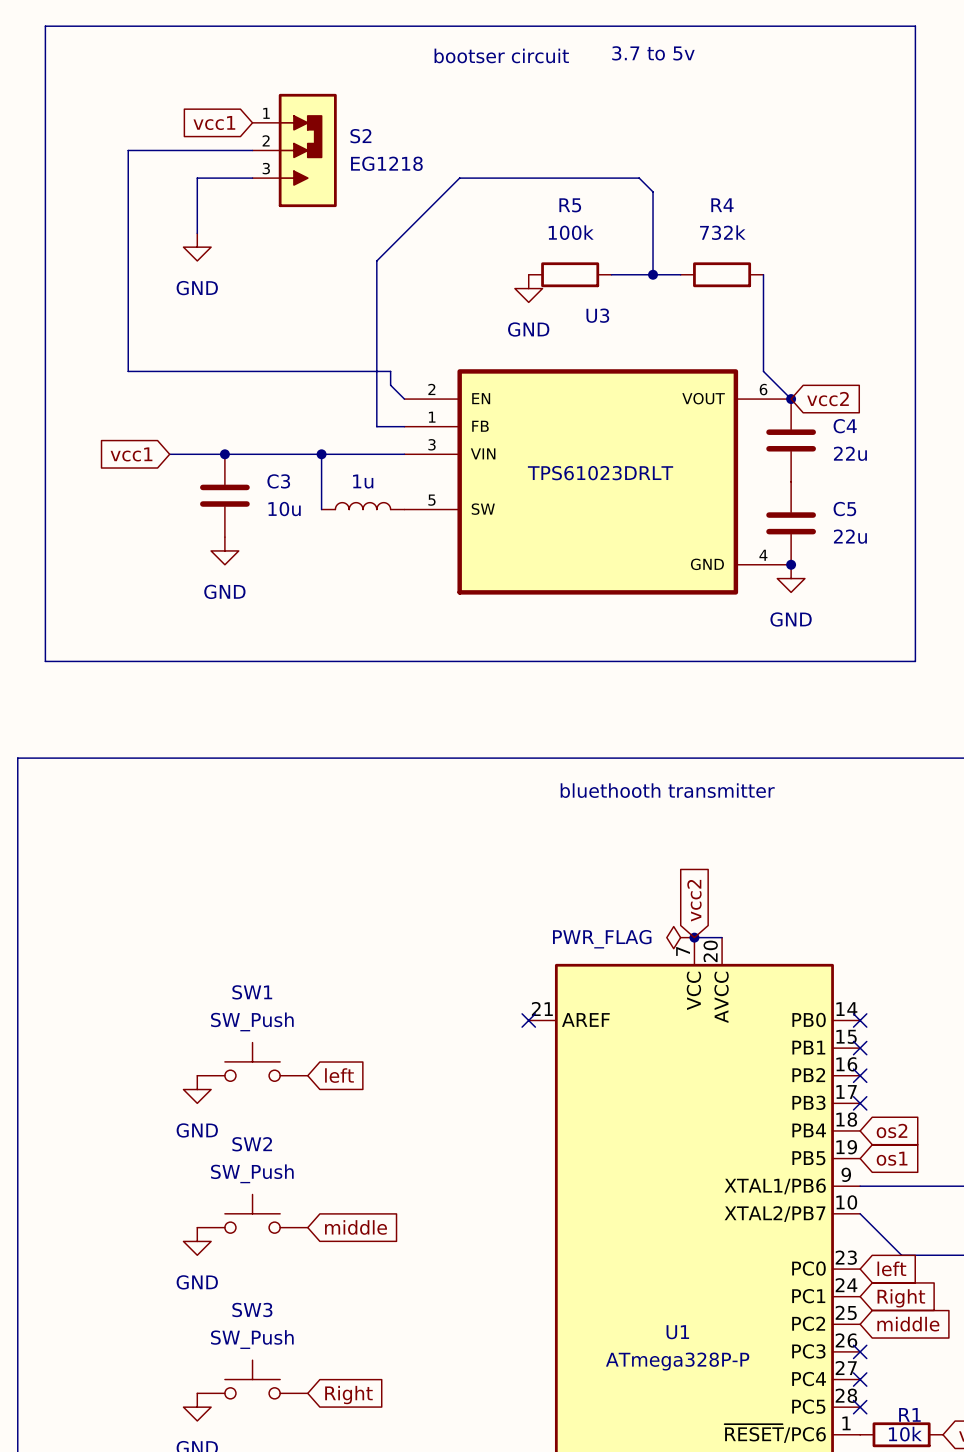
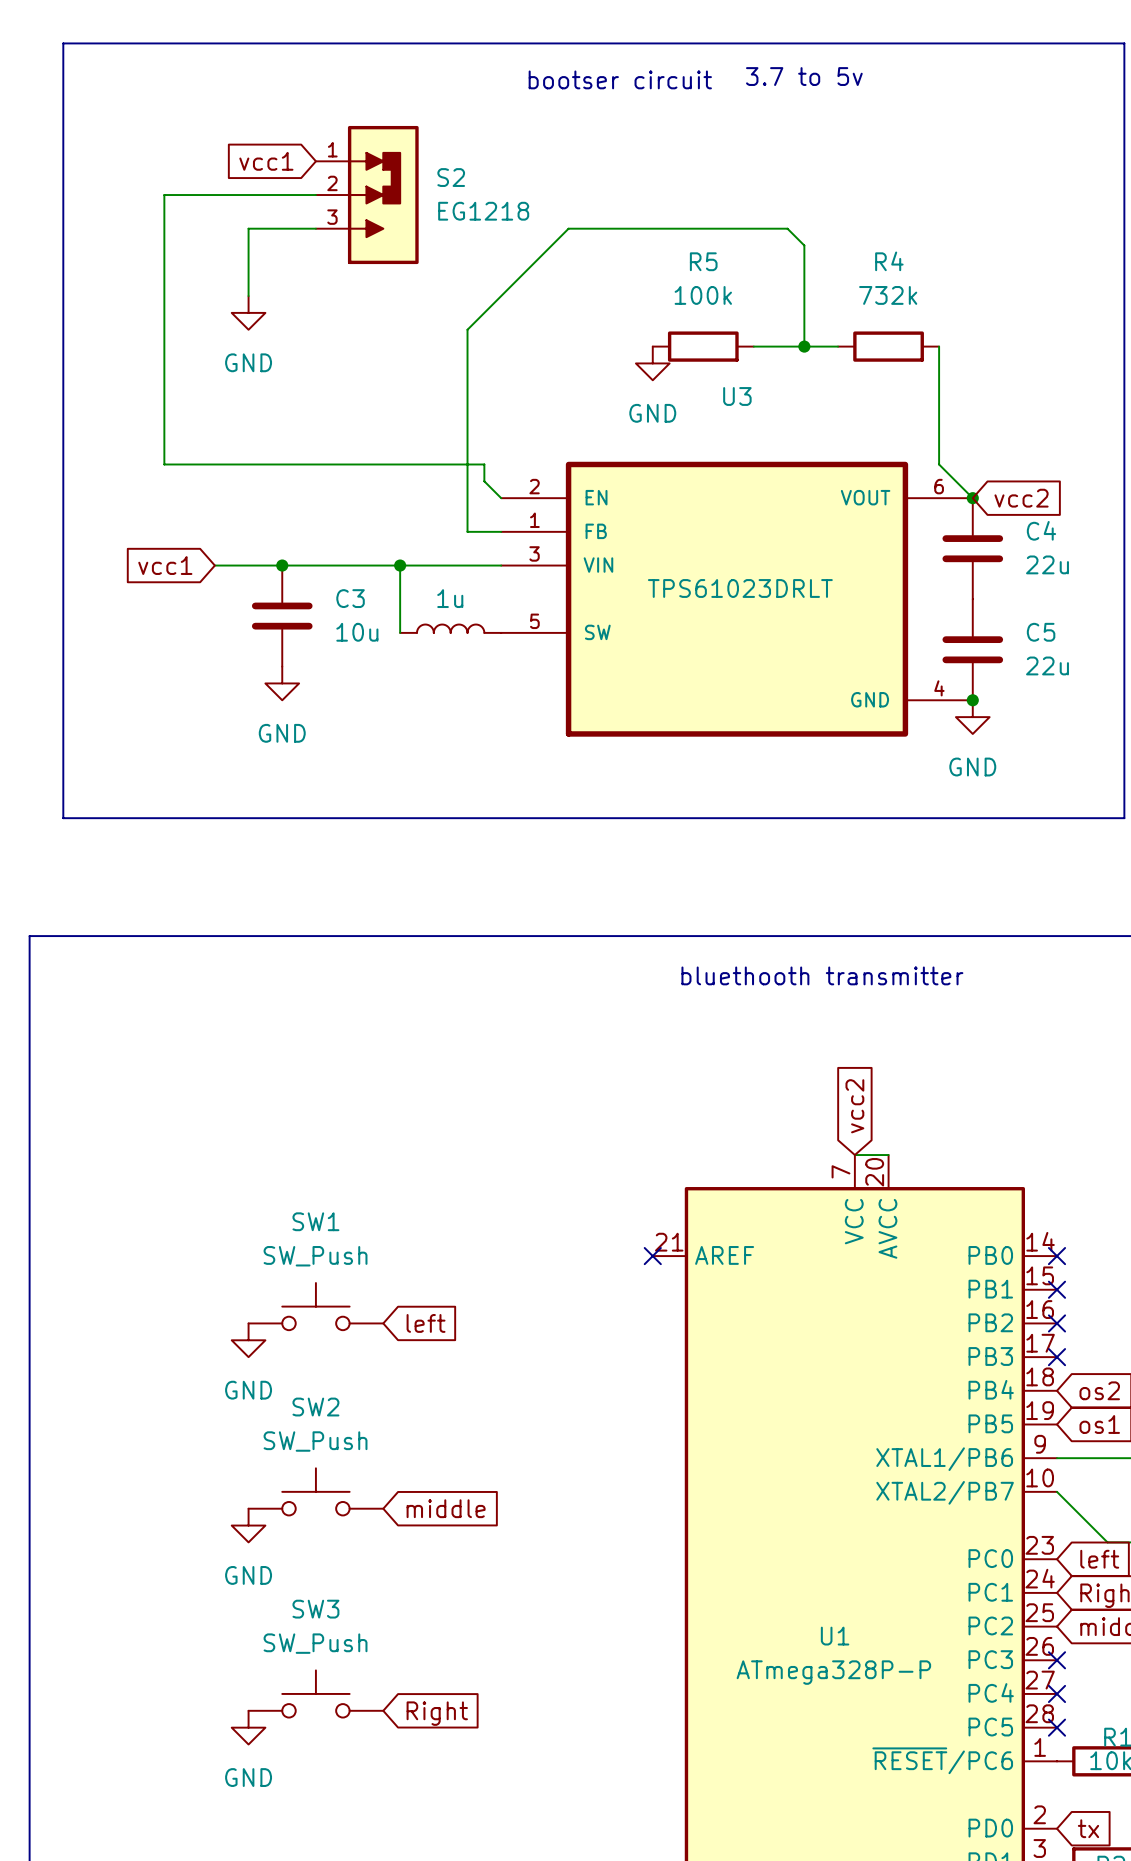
power symbol: PWR_FLAG (680, 937) -> none
junction: (694, 937) -> none

